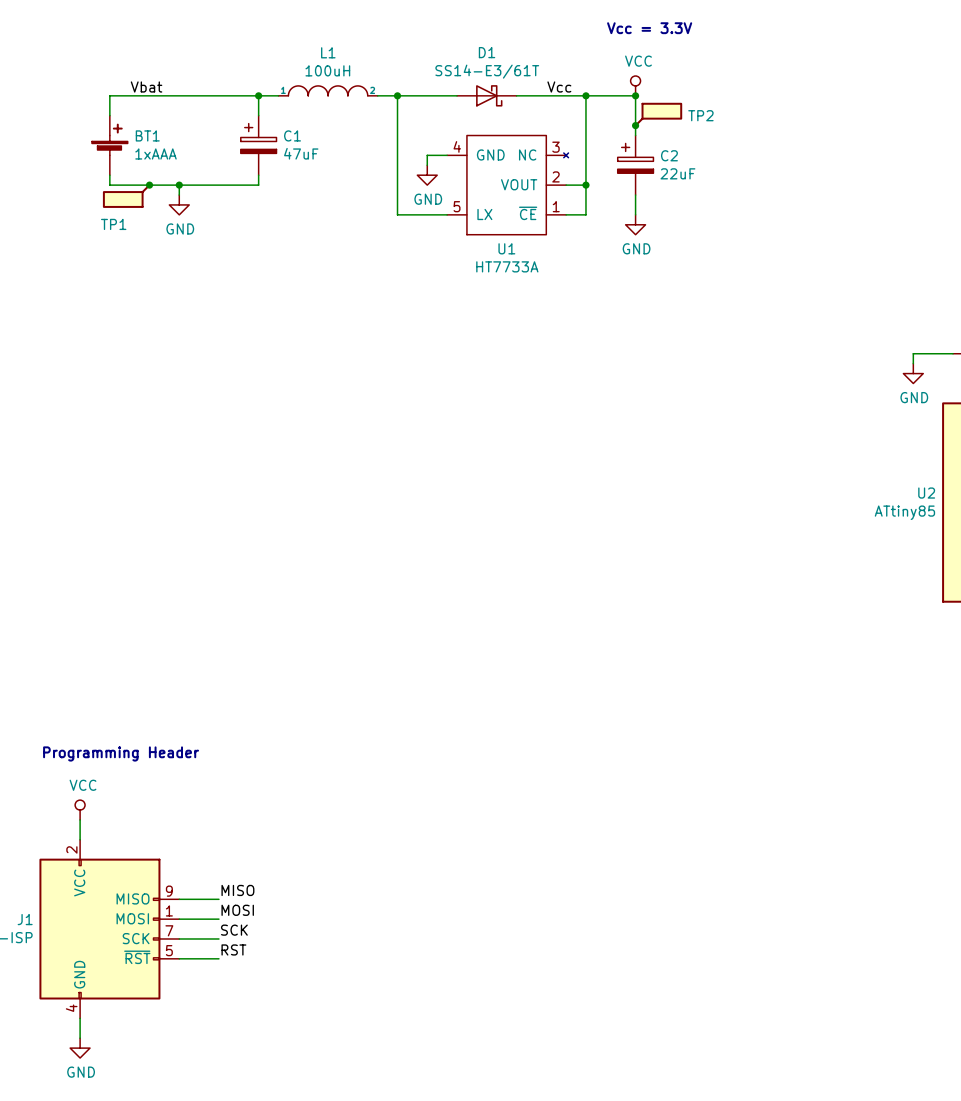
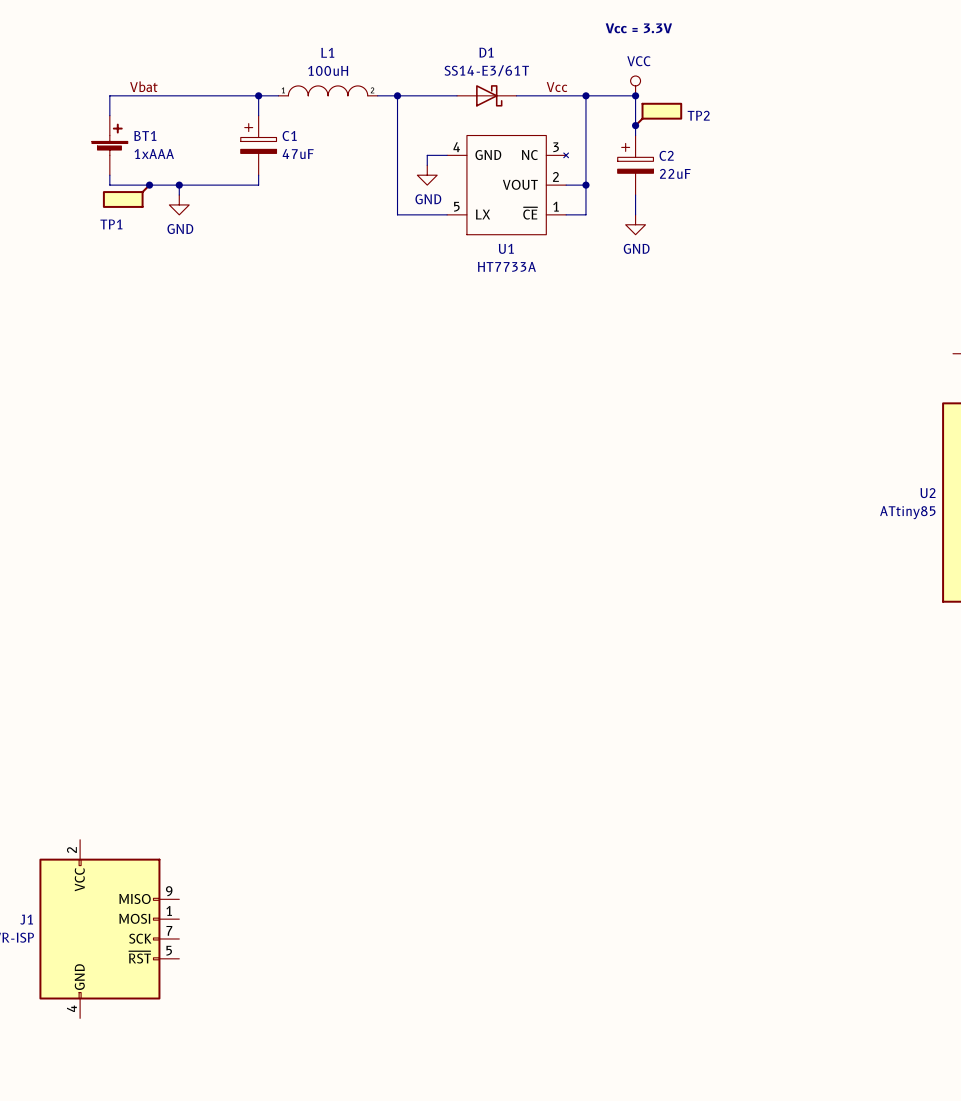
wire: (953, 353) (913, 353) (913, 363) -> none
power symbol: GND (913, 373) -> none
text: Programming Header (121, 753) -> none
power symbol: VCC (80, 810) -> none
wire: (80, 819) (80, 839) -> none
label: MISO (237, 890) -> none
wire: (179, 899) (218, 899) -> none
label: MOSI (237, 910) -> none
wire: (179, 919) (218, 919) -> none
label: SCK (234, 930) -> none
wire: (179, 938) (218, 938) -> none
label: RST (233, 949) -> none
wire: (179, 958) (218, 958) -> none
wire: (80, 1018) (80, 1038) -> none
power symbol: GND (80, 1048) -> none

